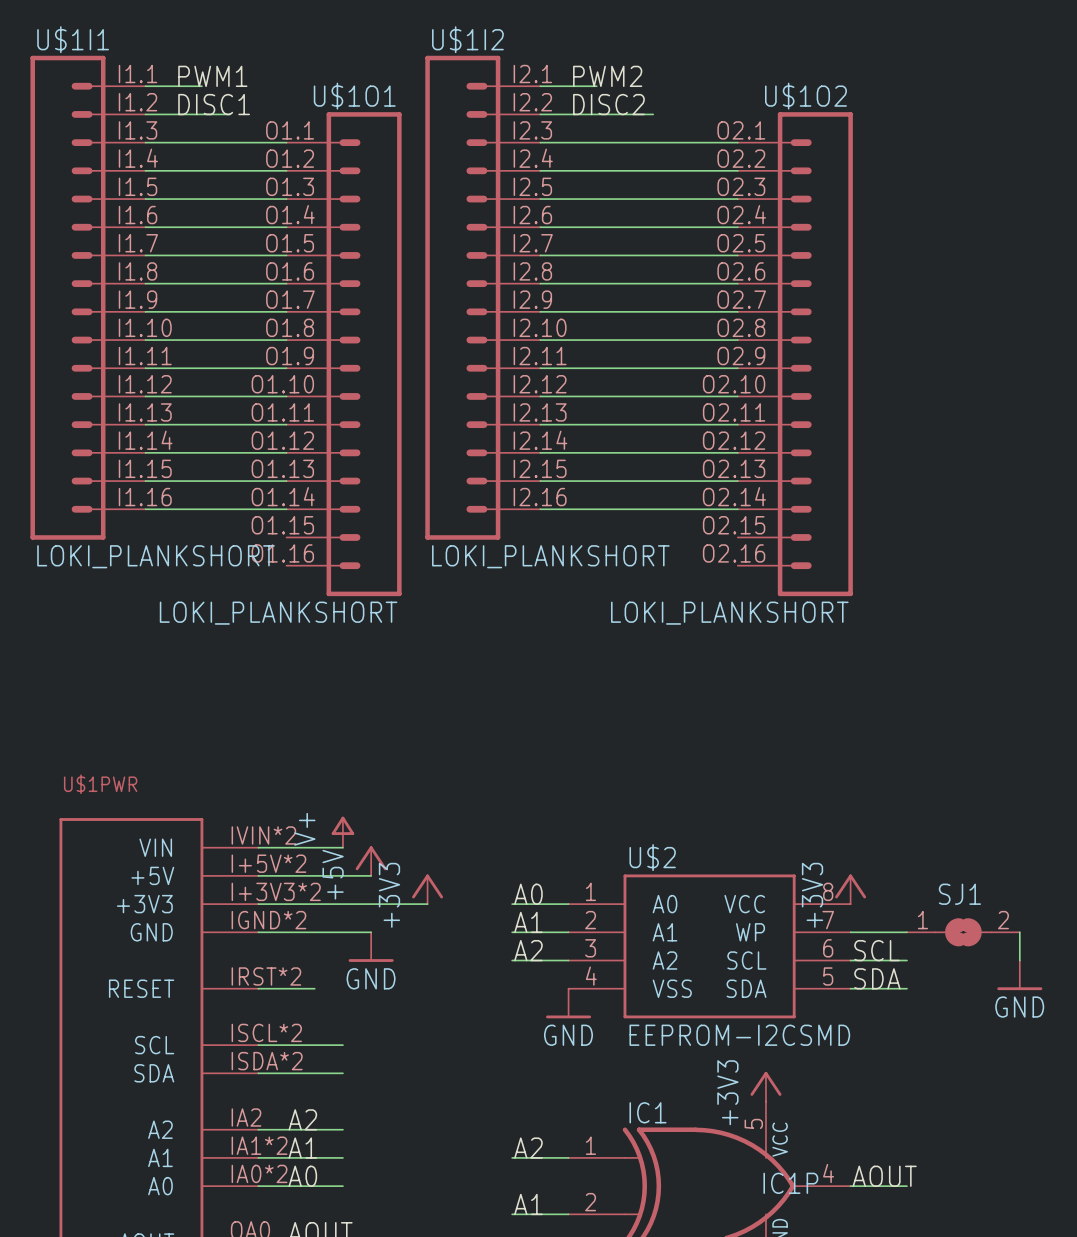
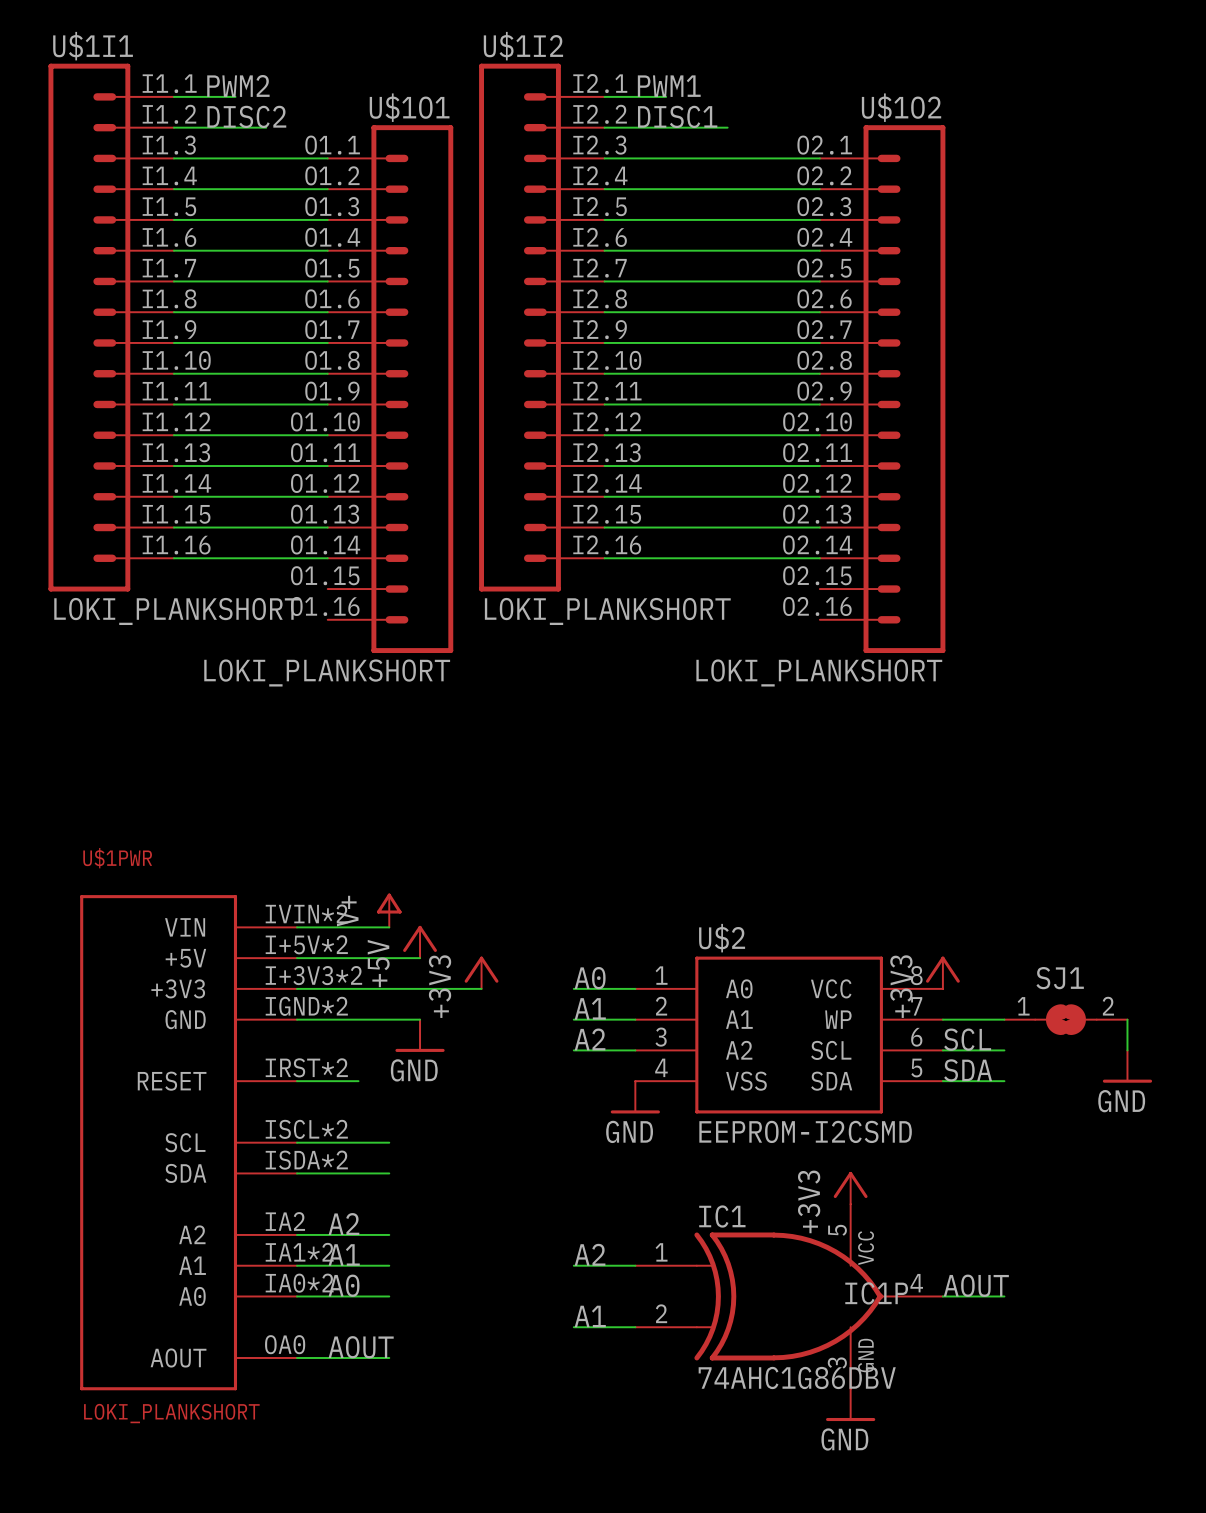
label: PWM1 (212, 76) -> PWM2 (238, 85)
label: PWM2 (607, 76) -> PWM1 (669, 86)
label: DISC1 (214, 104) -> DISC2 (246, 116)
label: DISC2 (608, 104) -> DISC1 (677, 116)

